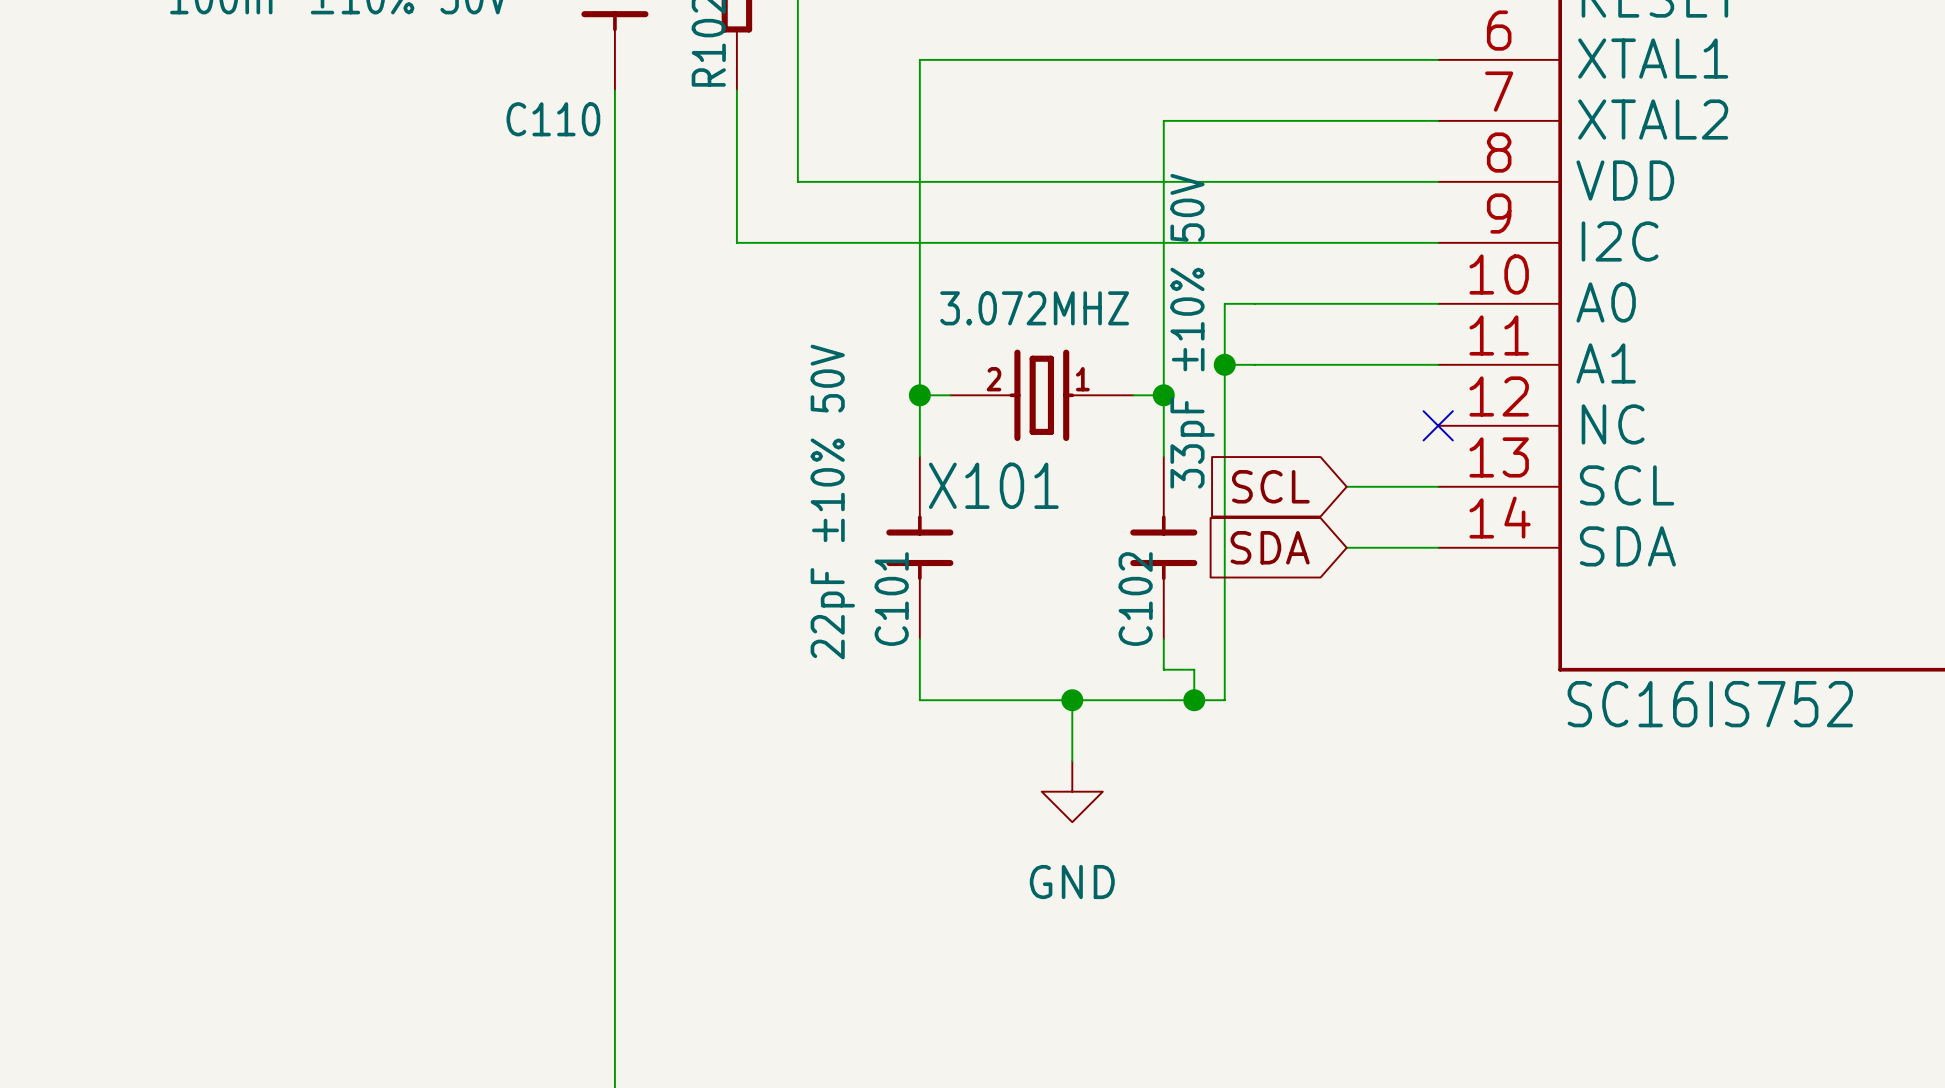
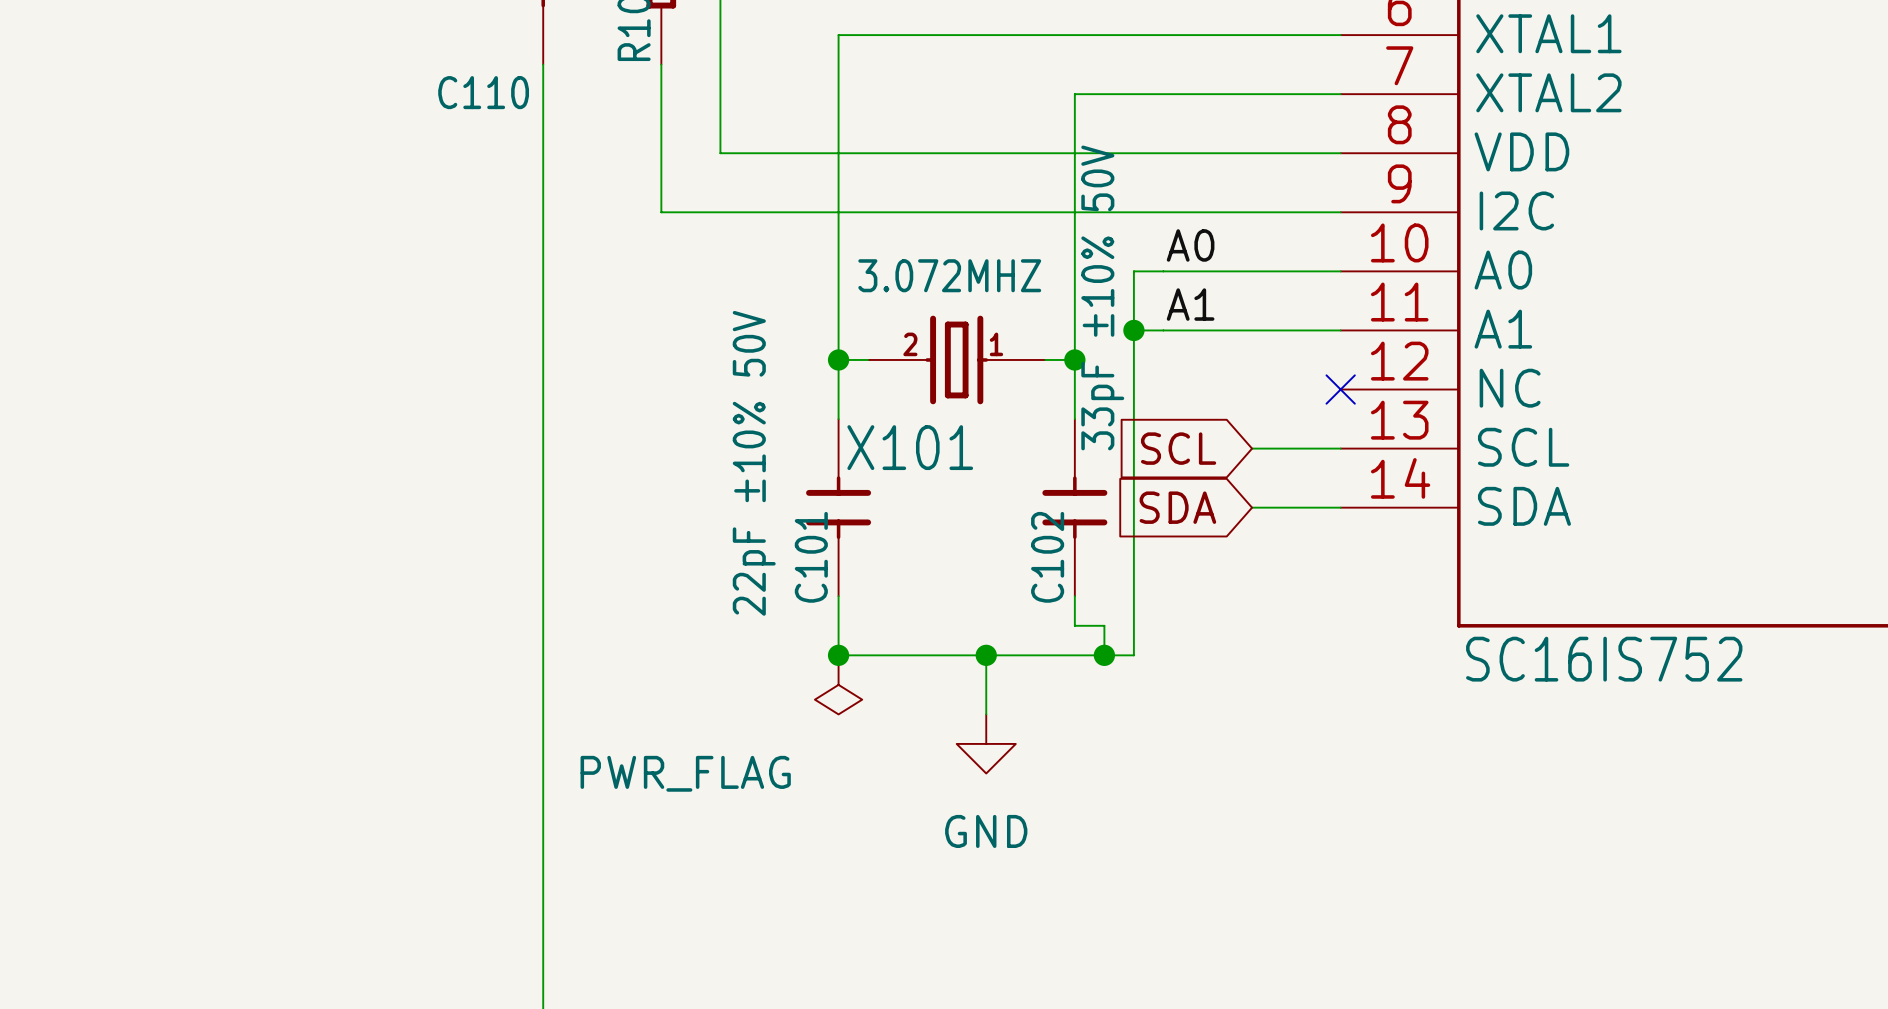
label: none -> A0 (1190, 245)
label: none -> A1 (1190, 304)
junction: none -> (838, 655)
power symbol: none -> PWR_FLAG (838, 684)

